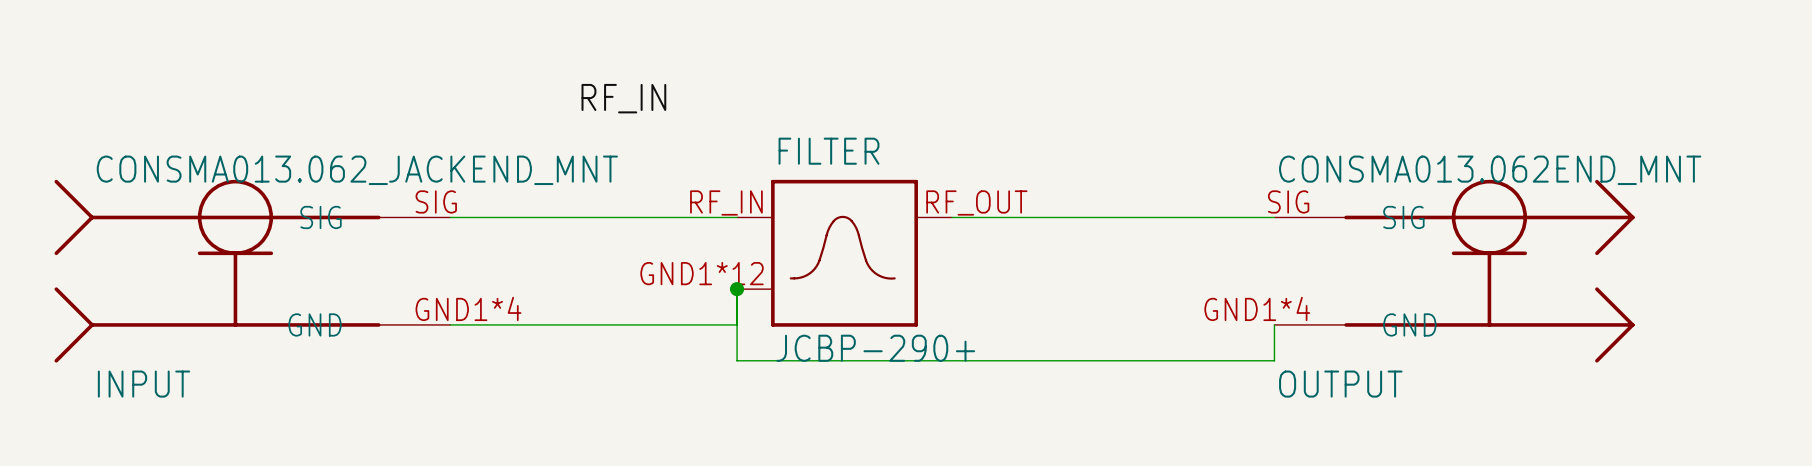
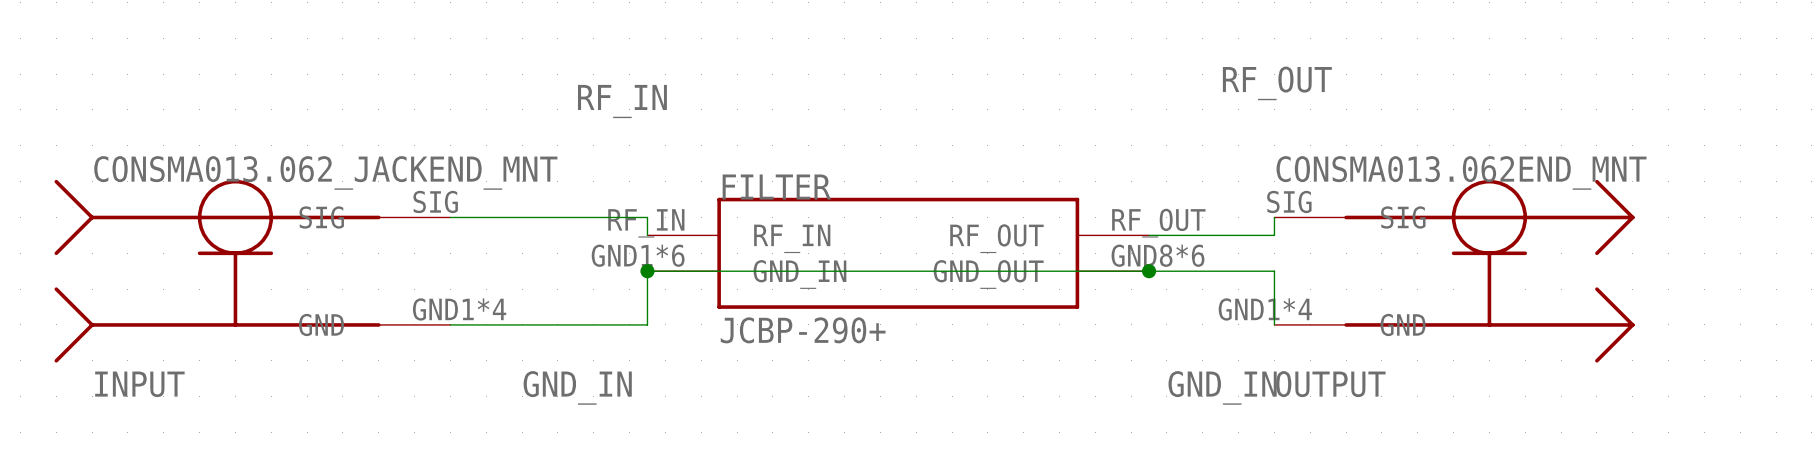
label: none -> RF_OUT (1277, 83)
wire: (647, 217) (737, 217) -> (647, 217) (647, 235)
wire: (952, 217) (1274, 217) -> (1149, 235) (1274, 235) (1274, 217)
FILTER: JCBP-290+ (844, 253) -> none
FILTER: none -> JCBP-290+ (898, 253)
junction: none -> (647, 271)
junction: none -> (1149, 271)
wire: (737, 289) (737, 360) (1274, 360) (1274, 324) -> (647, 324) (647, 271) (1274, 271) (1274, 324)
junction: (737, 289) -> none
wire: (647, 324) (737, 324) -> none
label: none -> GND_IN (577, 387)
label: none -> GND_IN (1222, 387)

